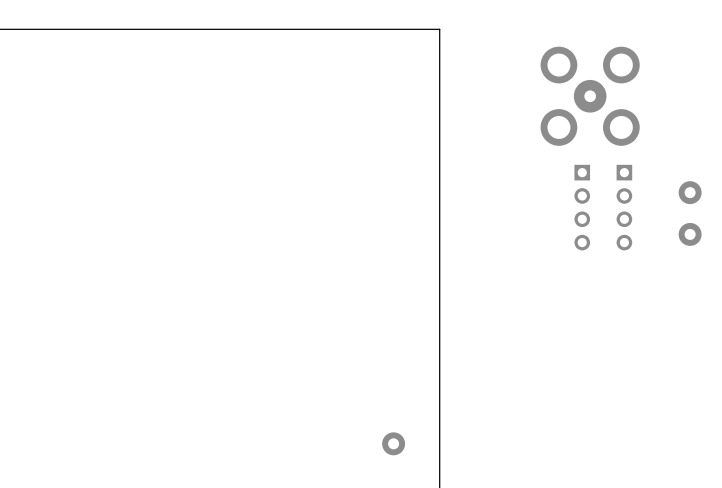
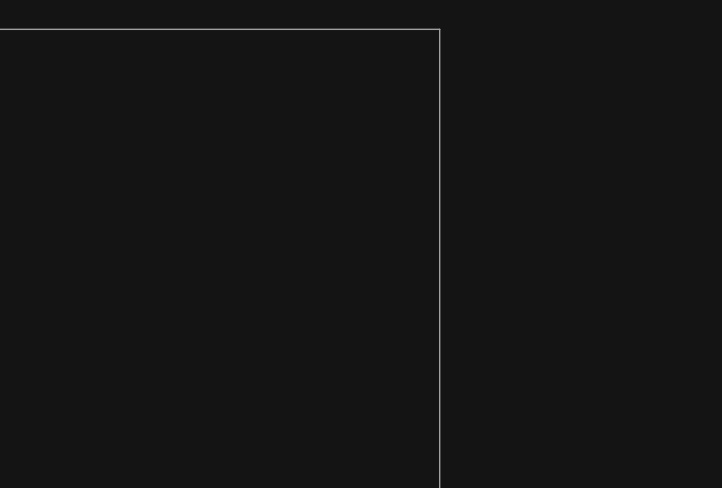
part: (590, 96) -> none
part: (690, 192) -> none
part: (582, 207) -> none
part: (624, 207) -> none
part: (690, 234) -> none
part: (393, 443) -> none

